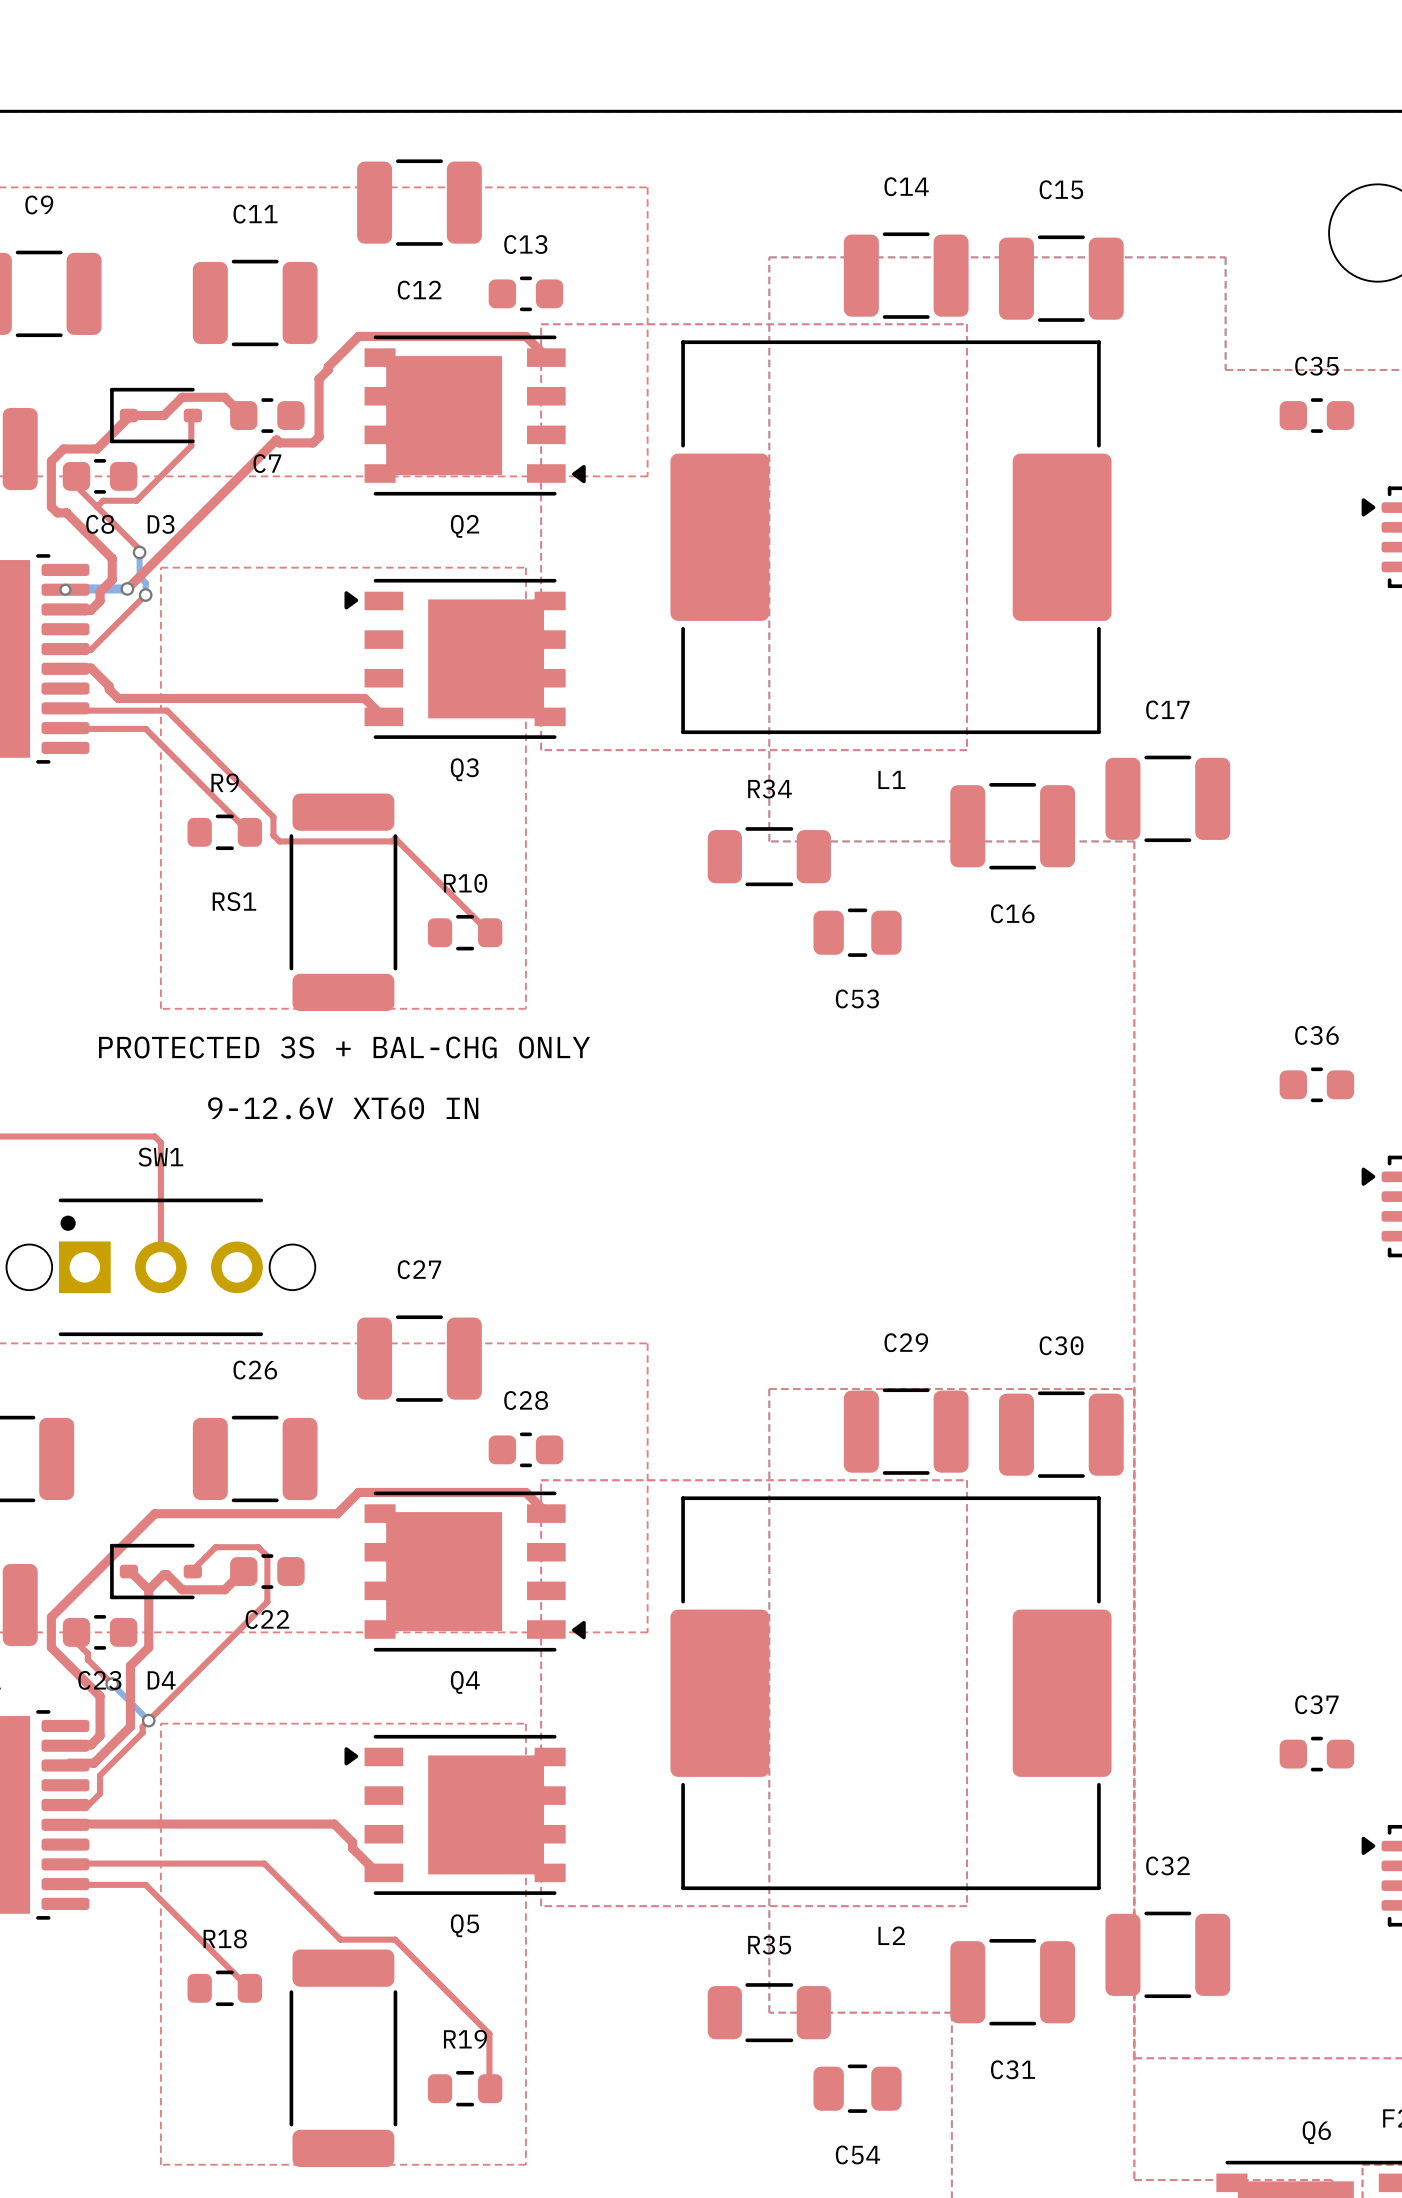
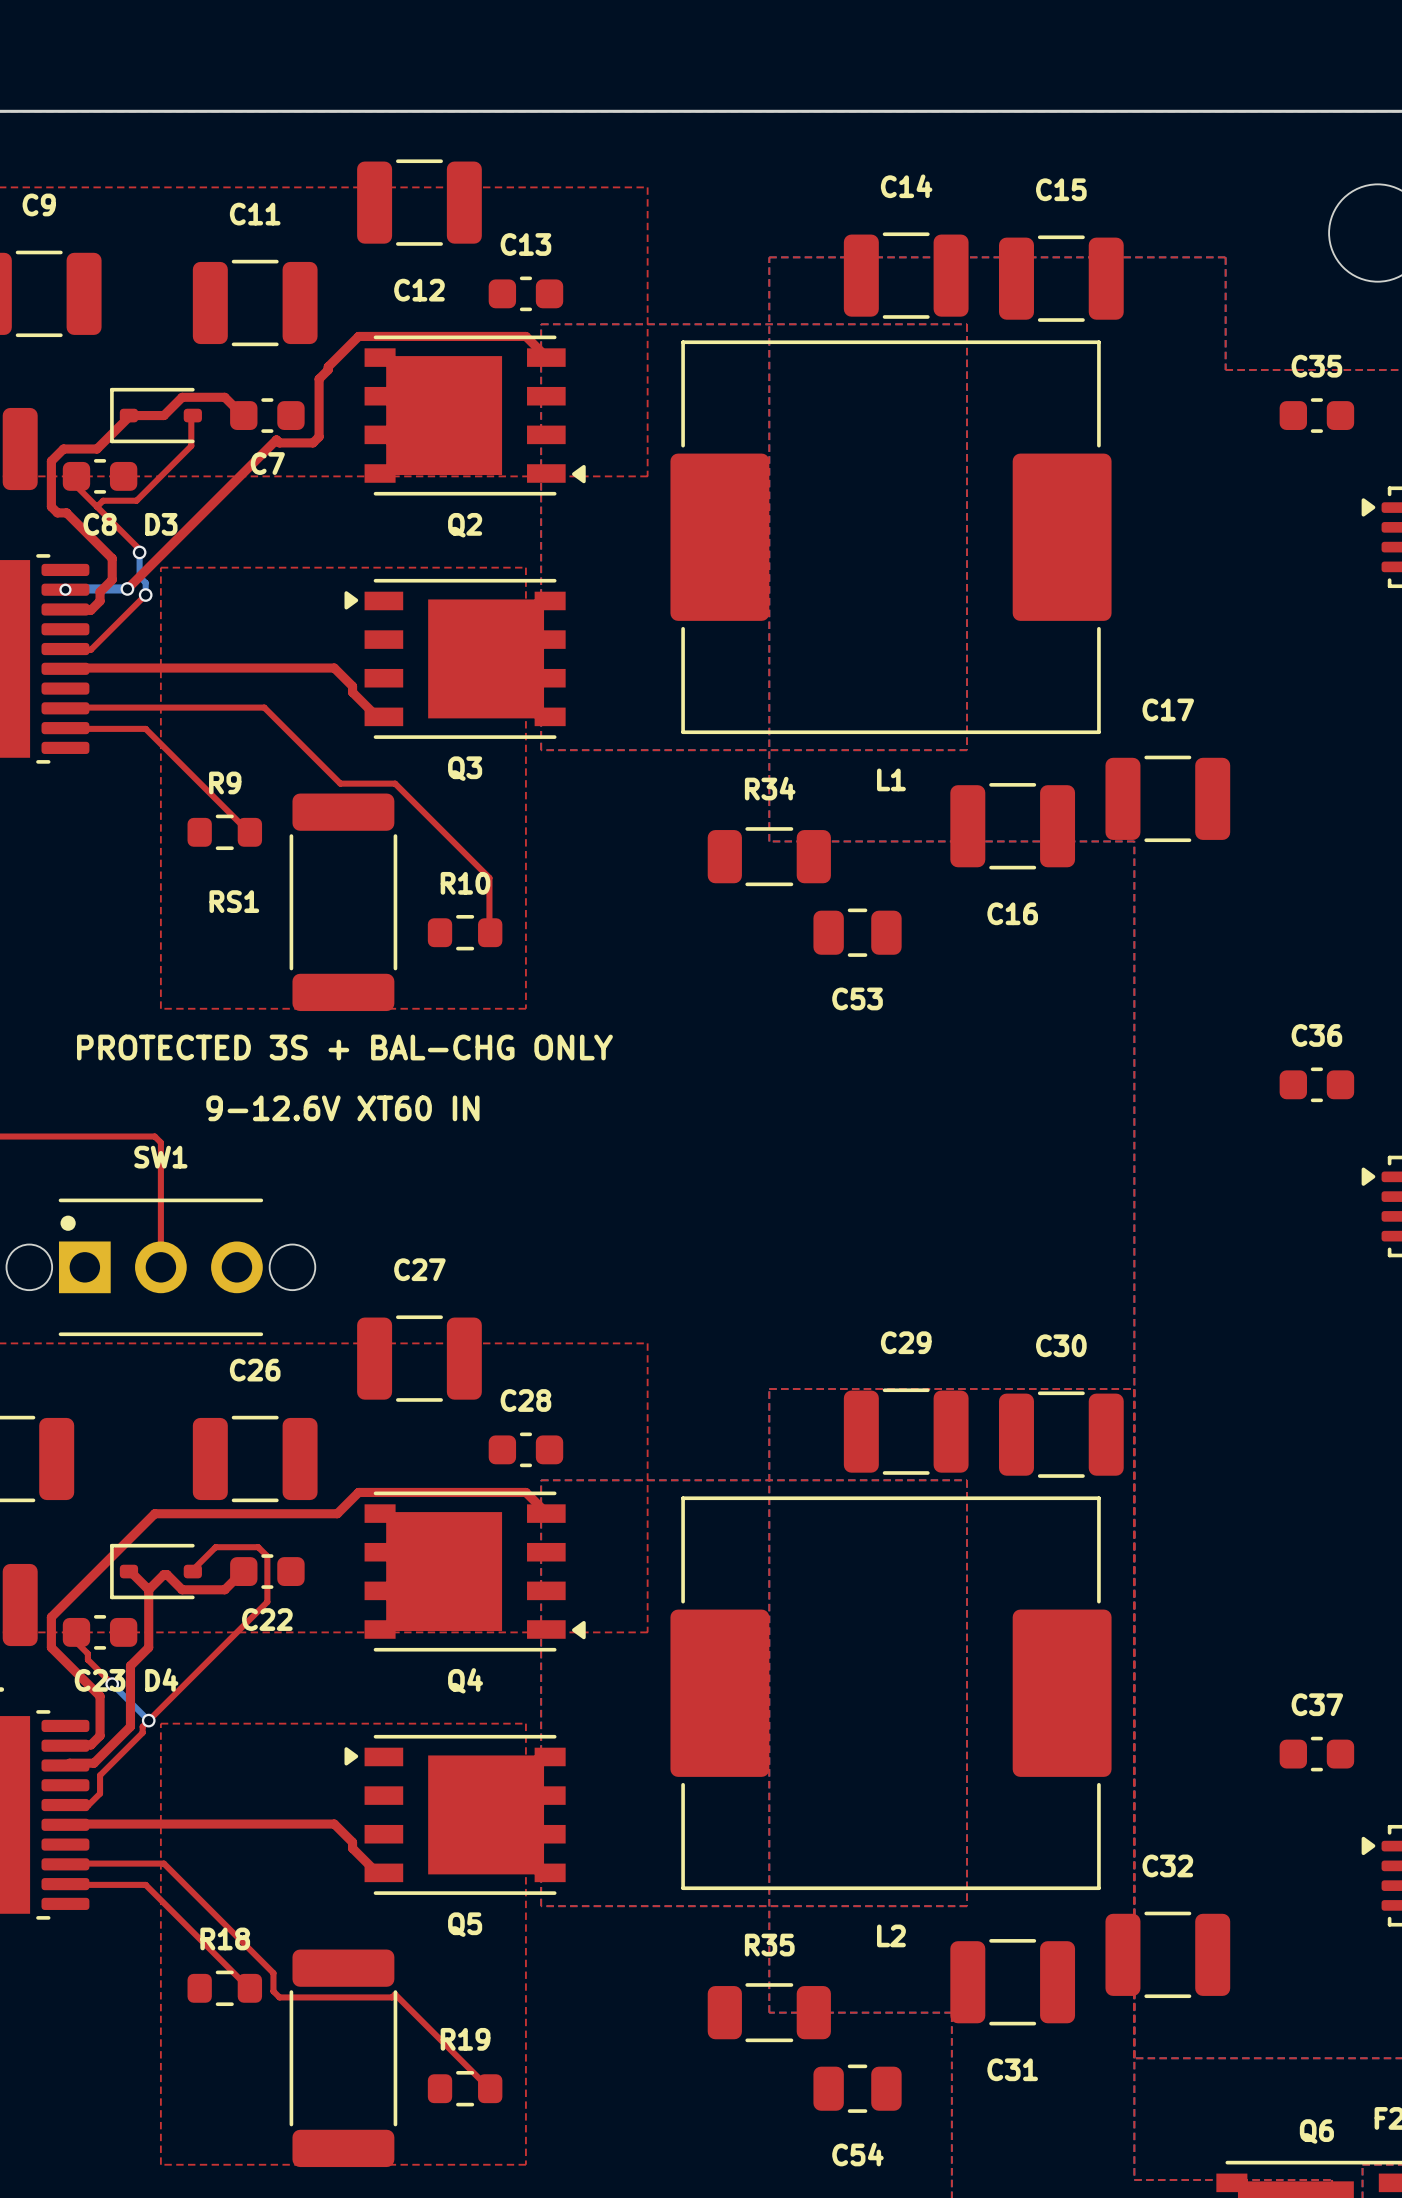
top track: (90, 668) (118, 698) (364, 698) (382, 716) -> (90, 668) (334, 668) (352, 686) (352, 692) (376, 716) (382, 716)
top track: (66, 707) (69, 710) (166, 710) (273, 817) (273, 835) (279, 841) (392, 841) (395, 838) (489, 932) -> (66, 707) (264, 707) (340, 783) (395, 783) (489, 877) (489, 932)
top track: (163, 1863) (264, 1863) (340, 1939) (395, 1939) (489, 2033) (489, 2088) -> (163, 1863) (273, 1973) (273, 1991) (279, 1997) (392, 1997) (395, 1994) (489, 2088)

